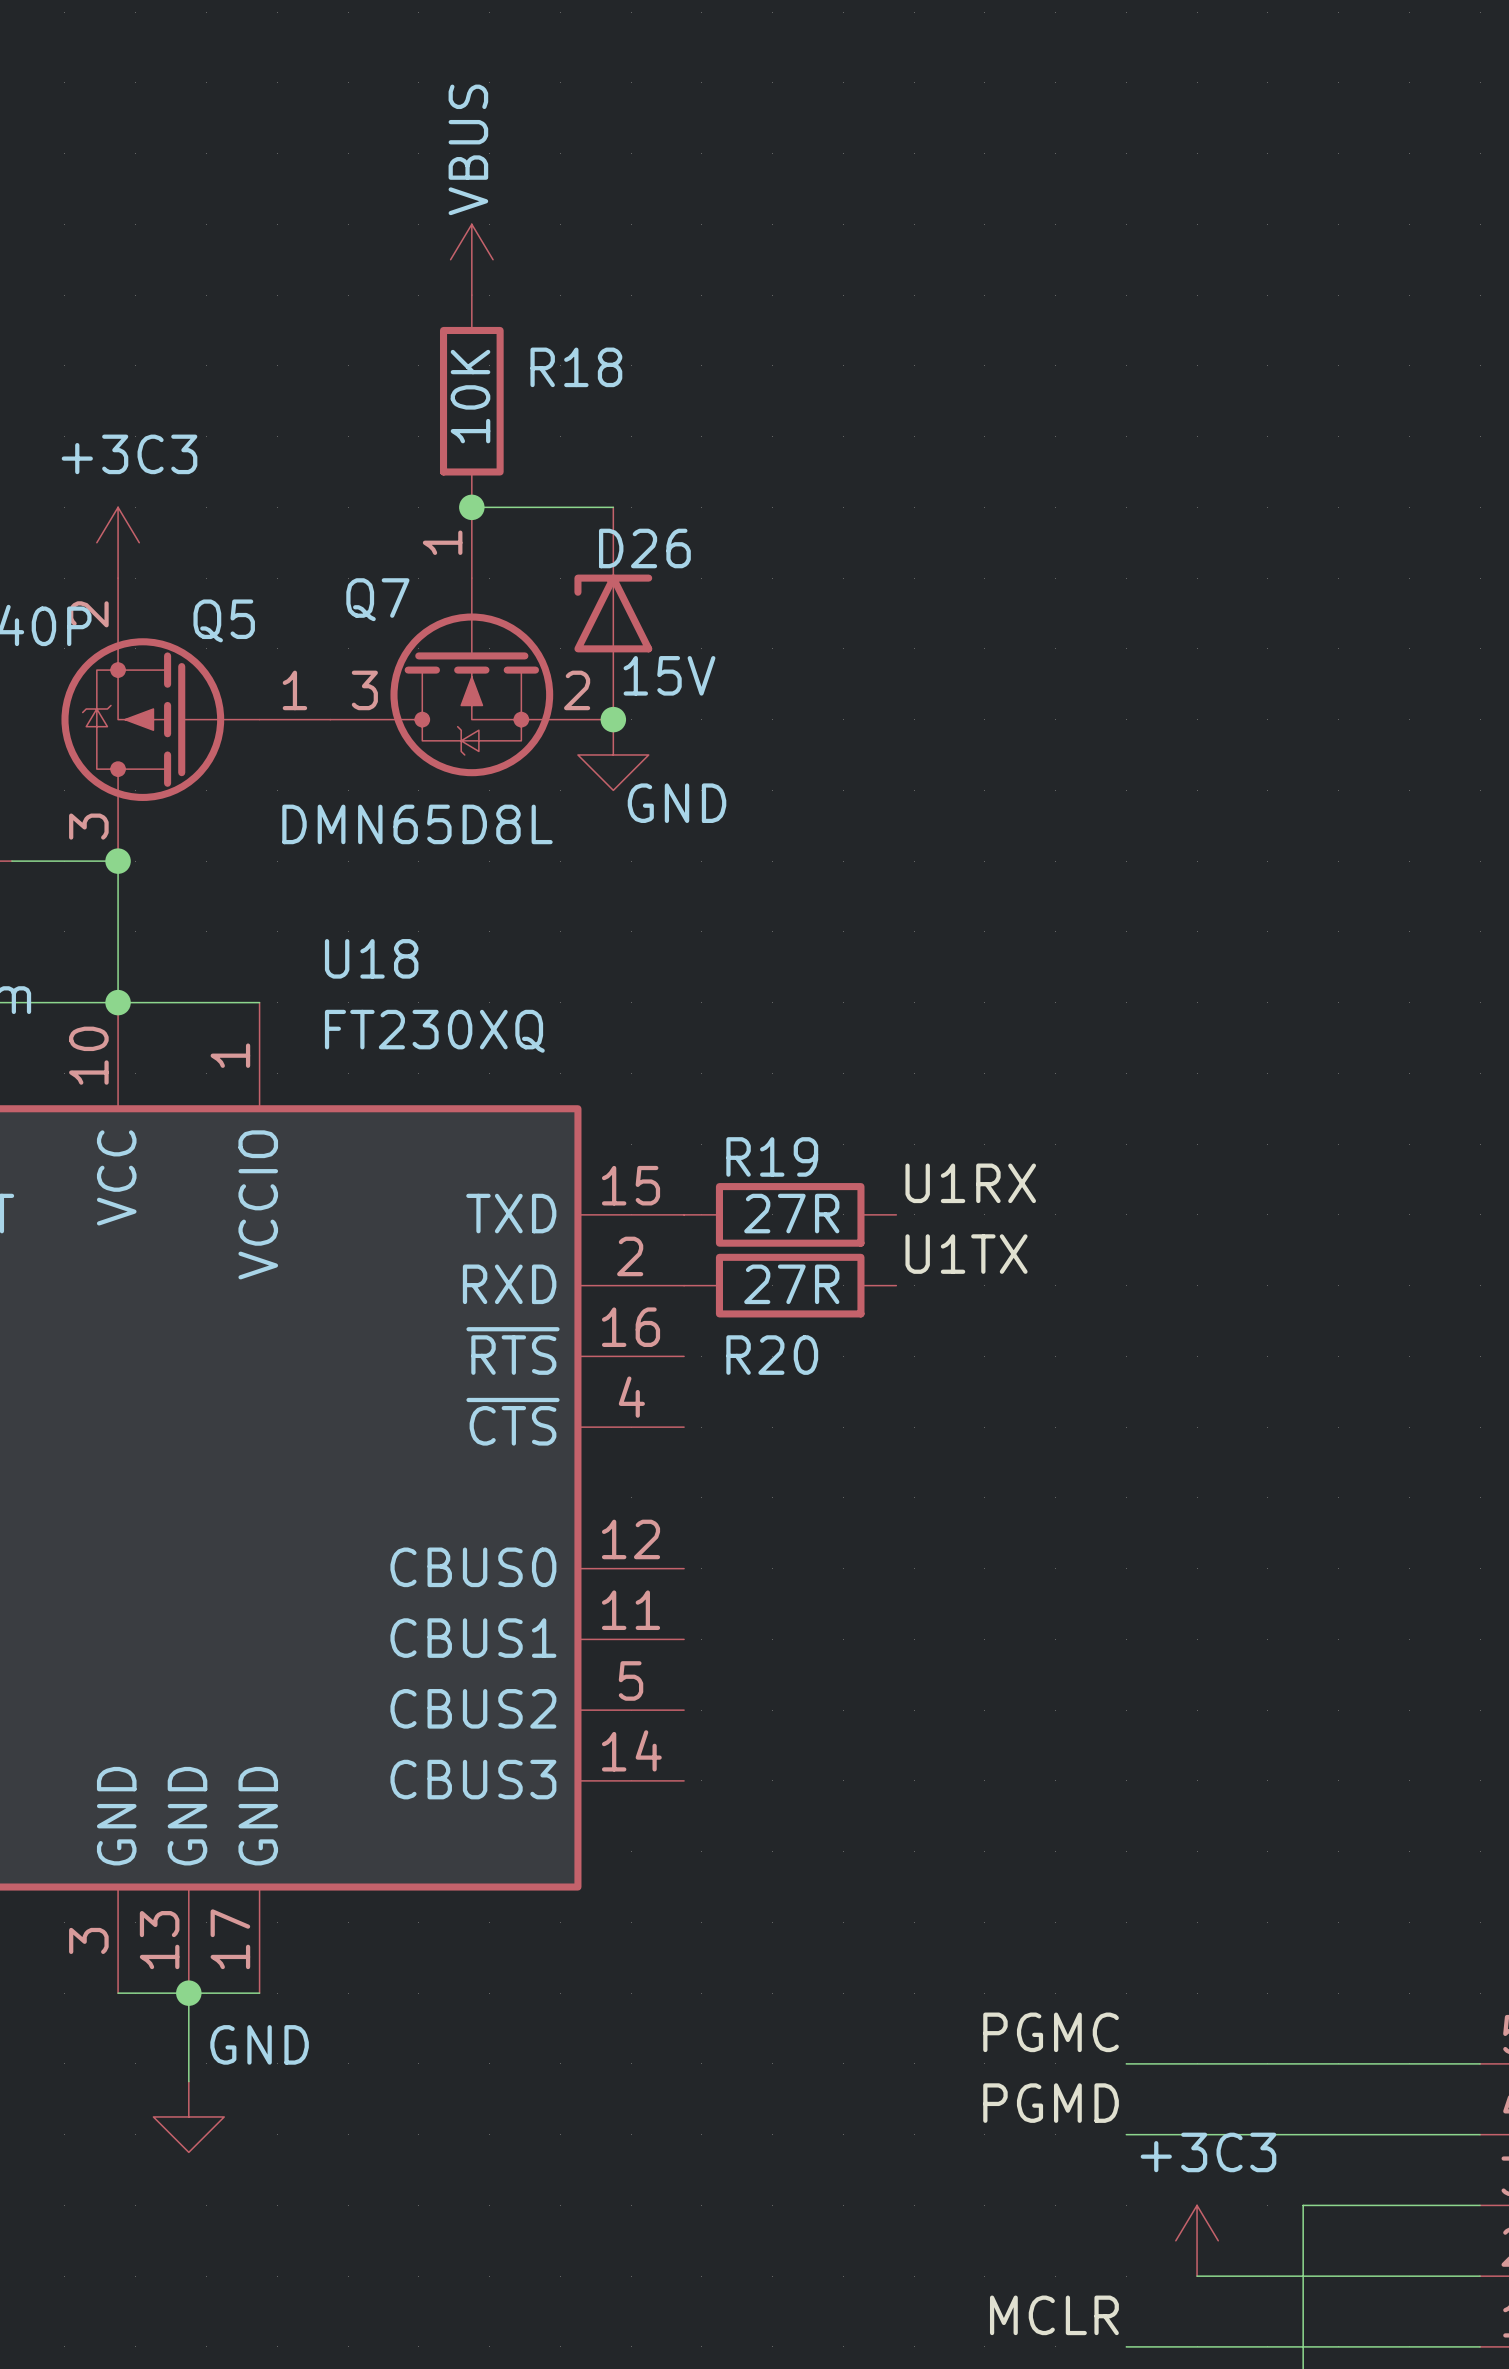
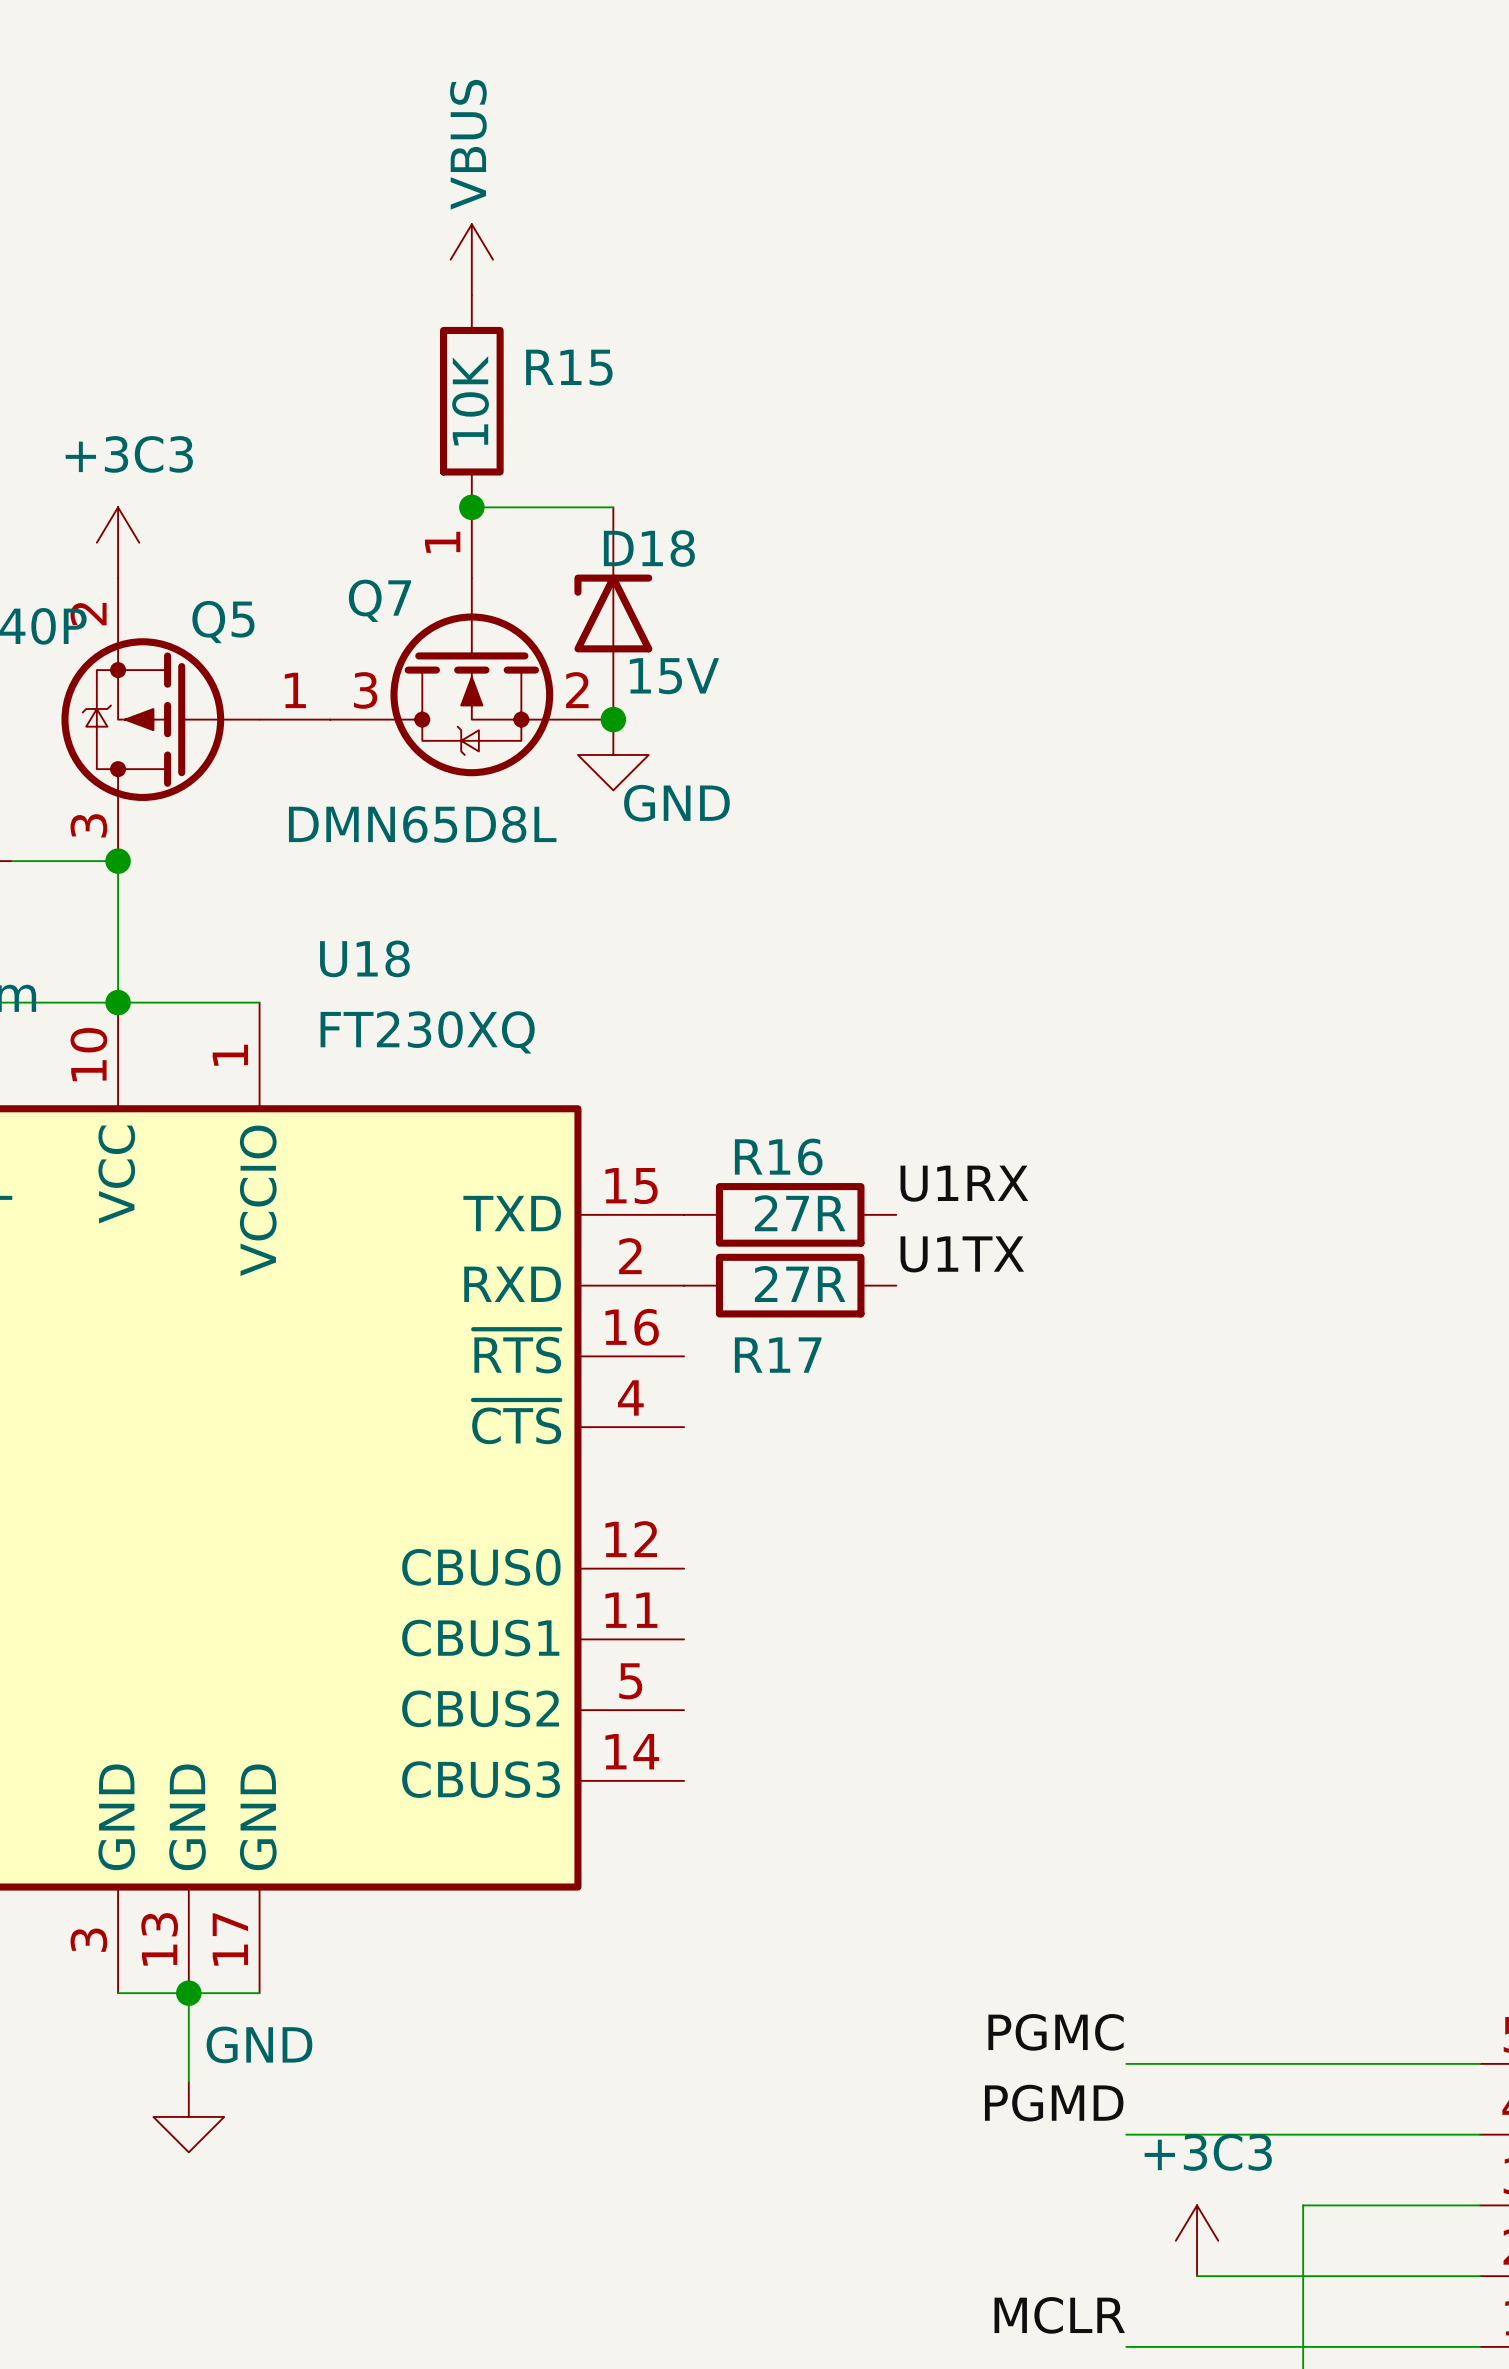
R18 name: R18 (576, 367) -> R15 (569, 367)
D26 name: D26 (644, 548) -> D18 (649, 548)
R19 name: R19 (772, 1156) -> R16 (778, 1156)
R20 name: R20 (772, 1355) -> R17 (778, 1355)

